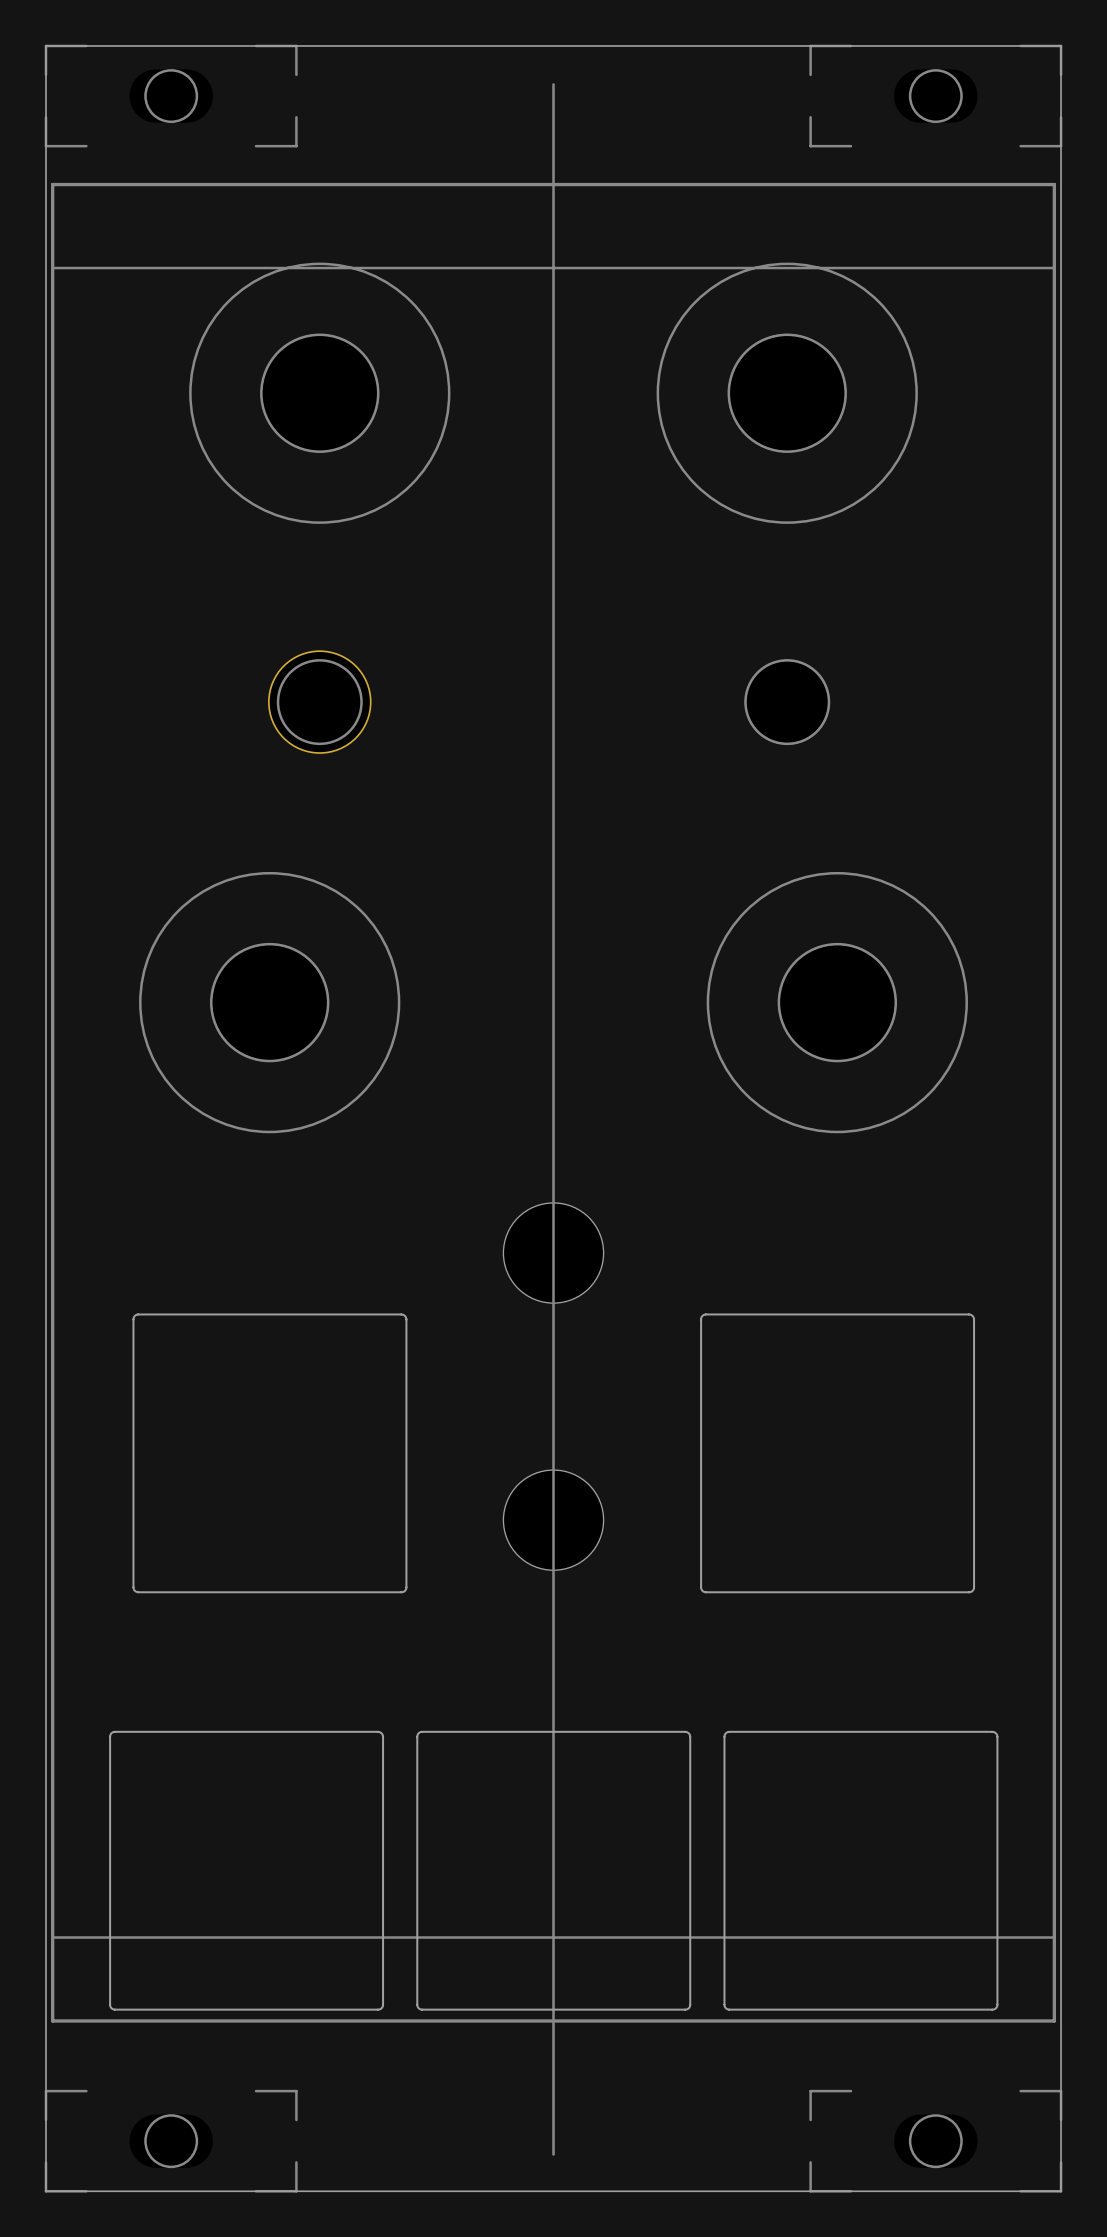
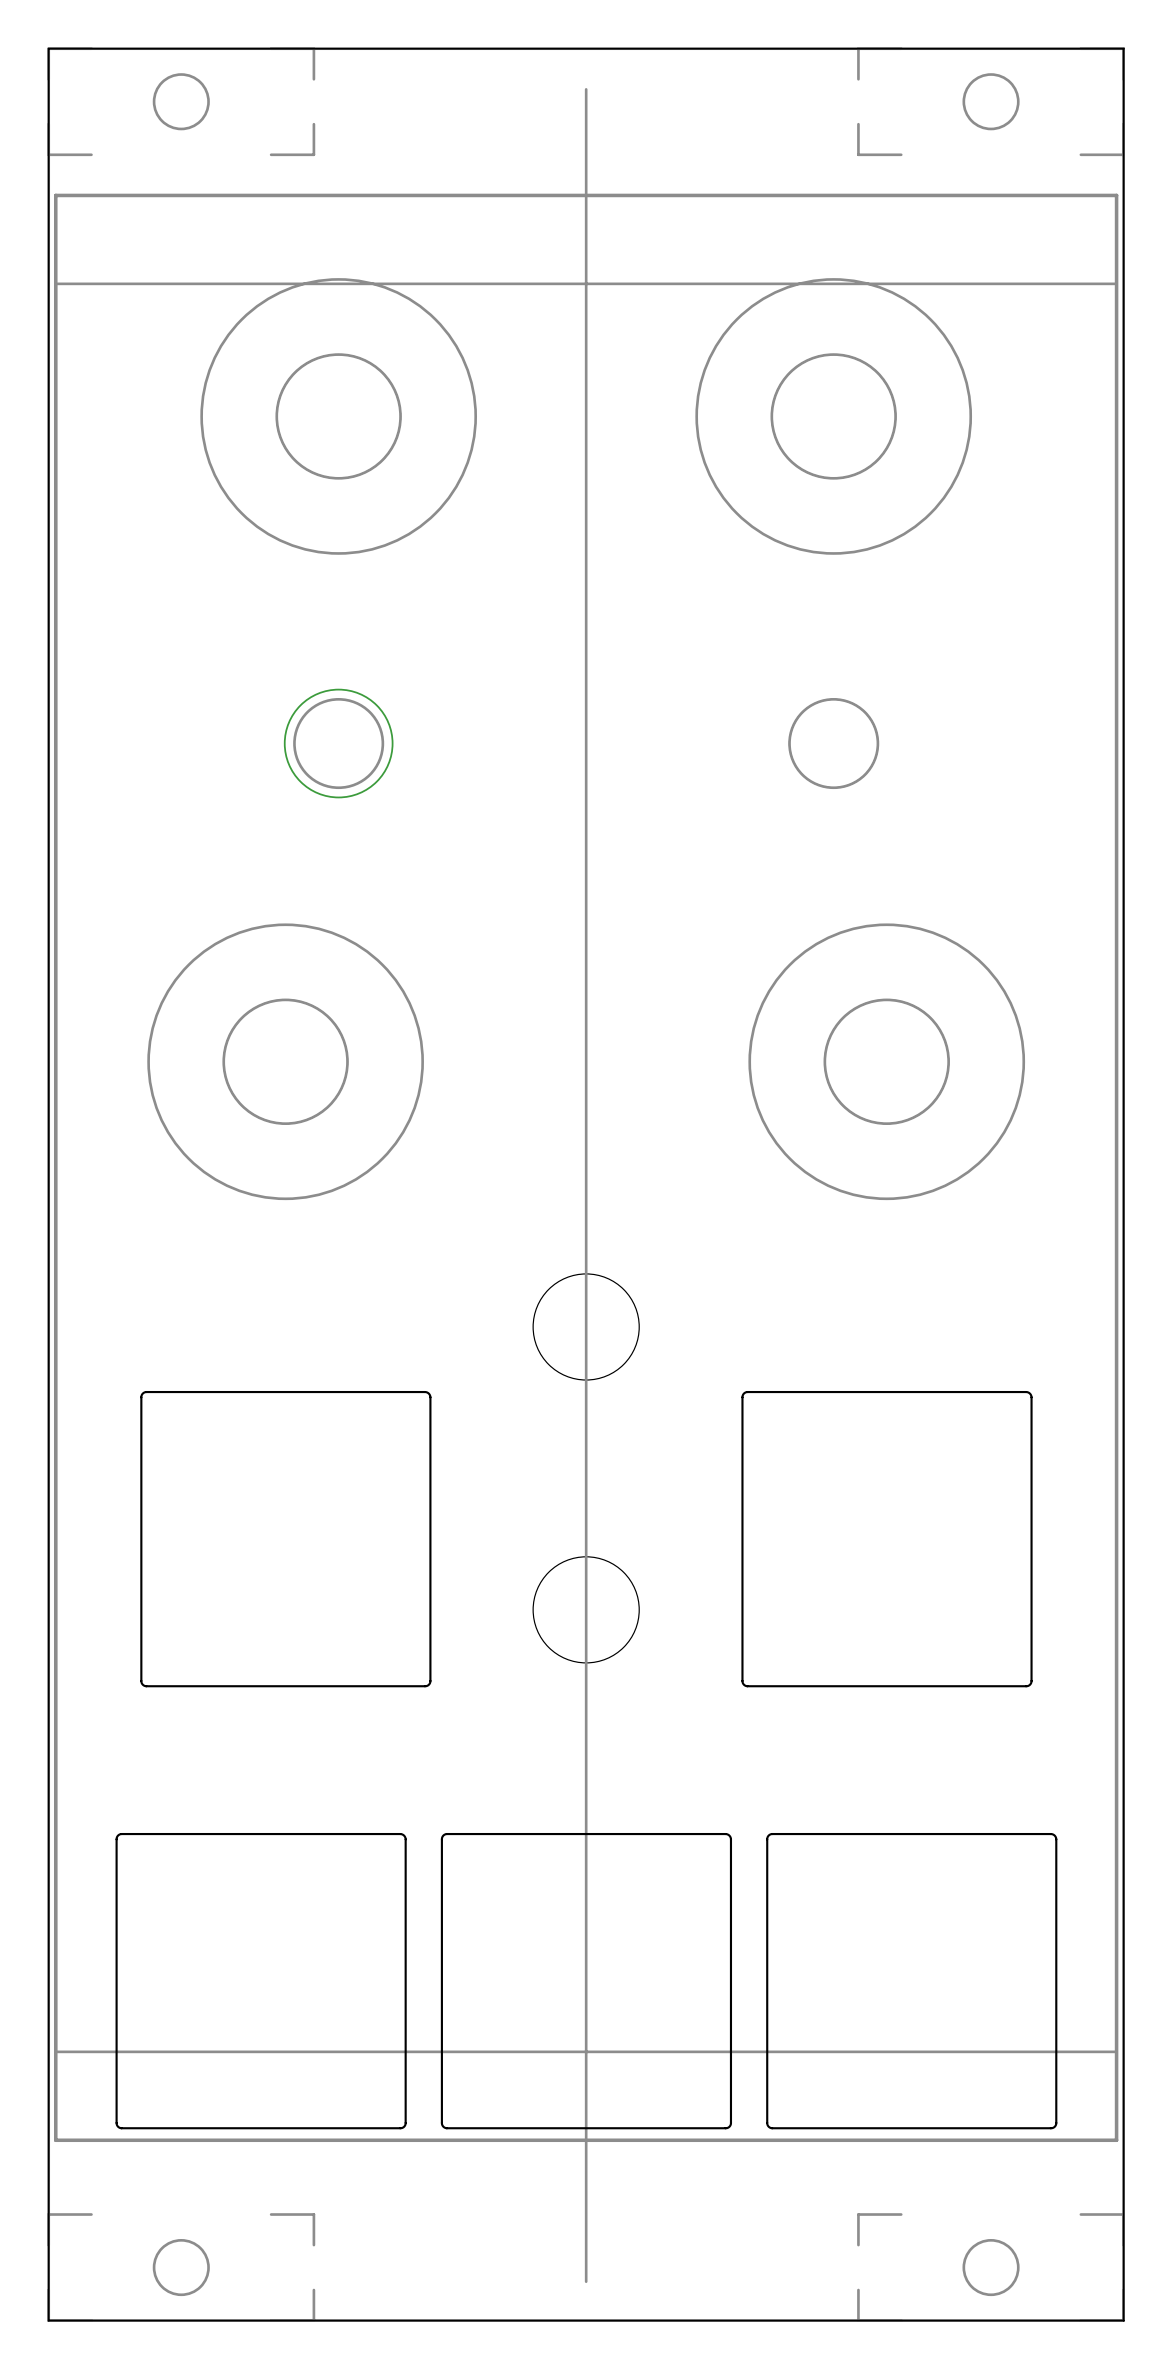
line: none -> (48, 48) (1123, 48) (1123, 2320) (48, 2320) (48, 48)

